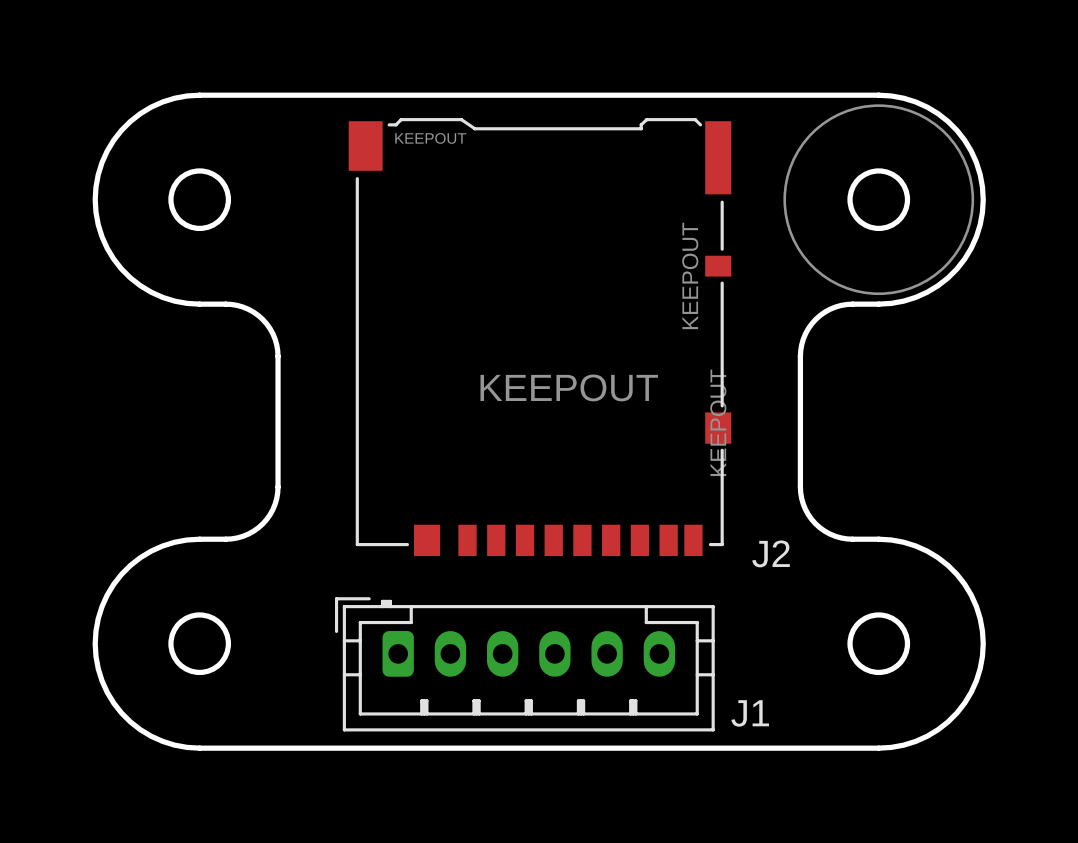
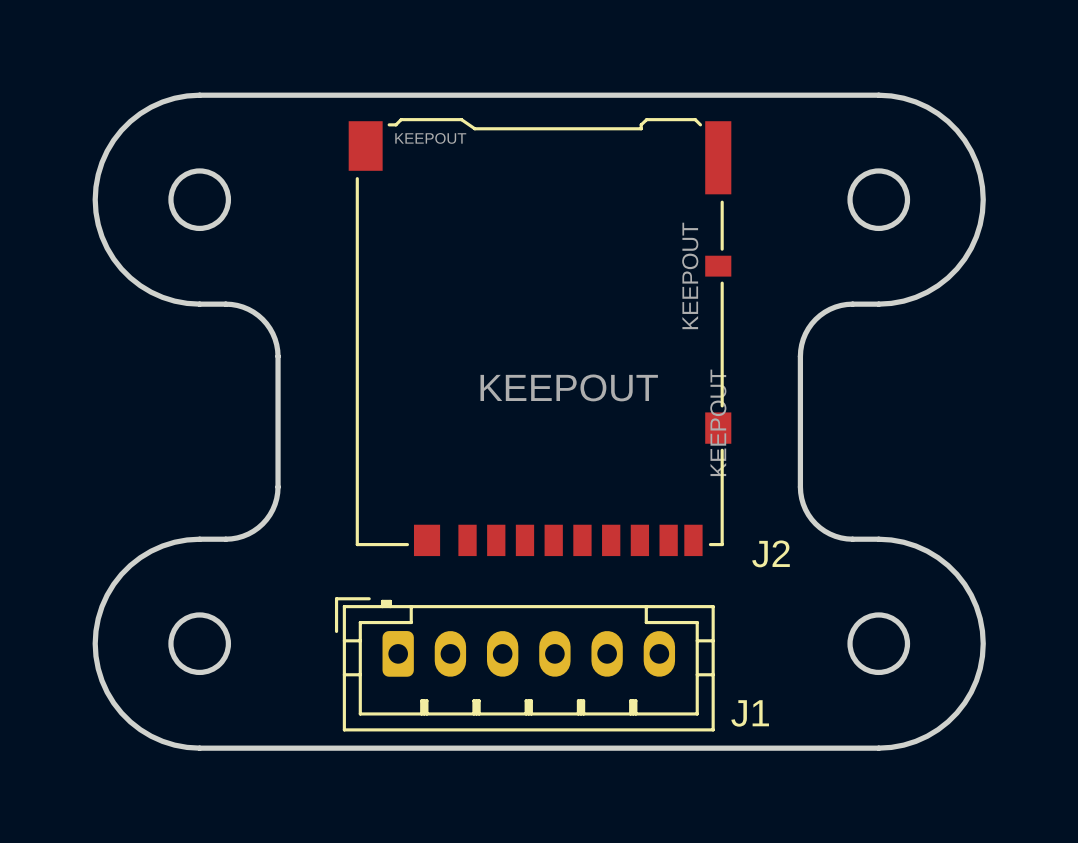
drawing: [783, 104, 975, 296] -> none

